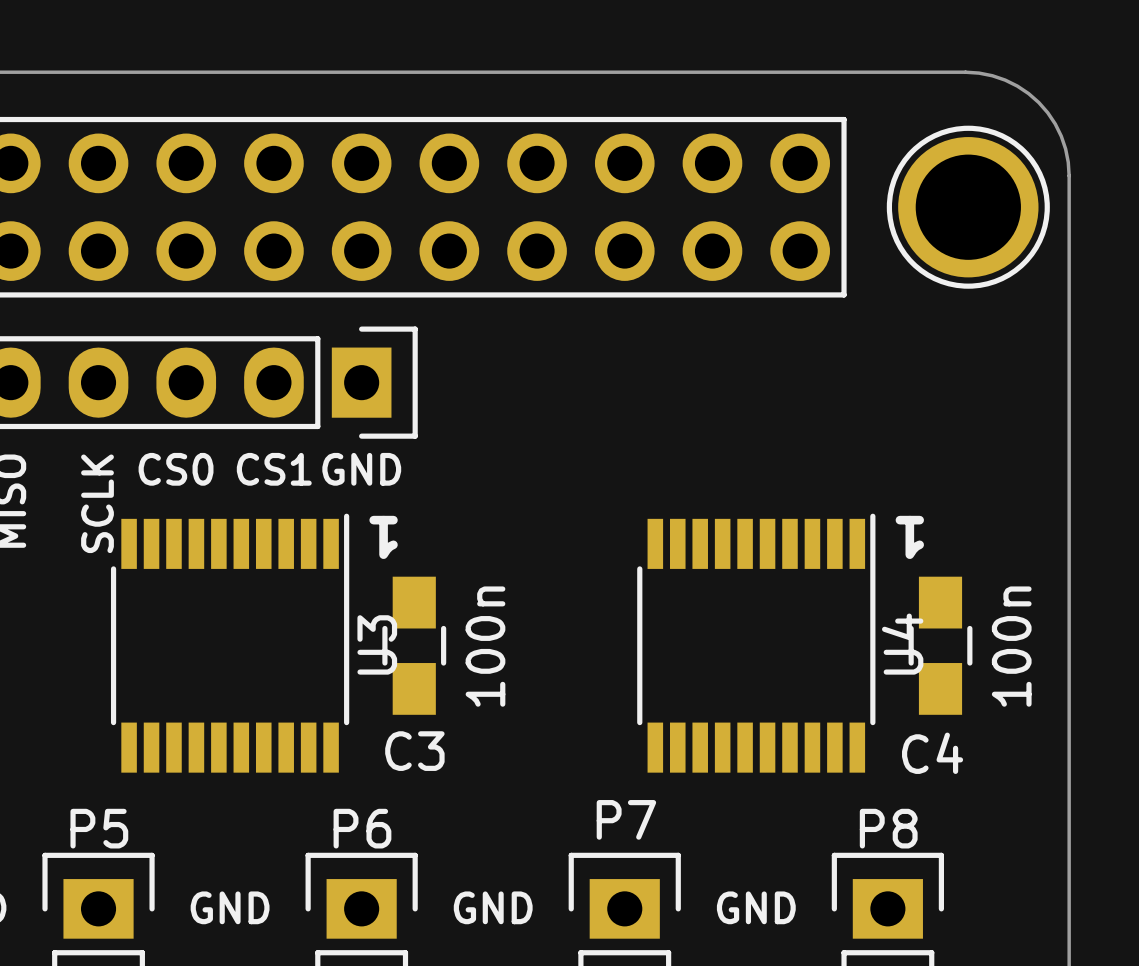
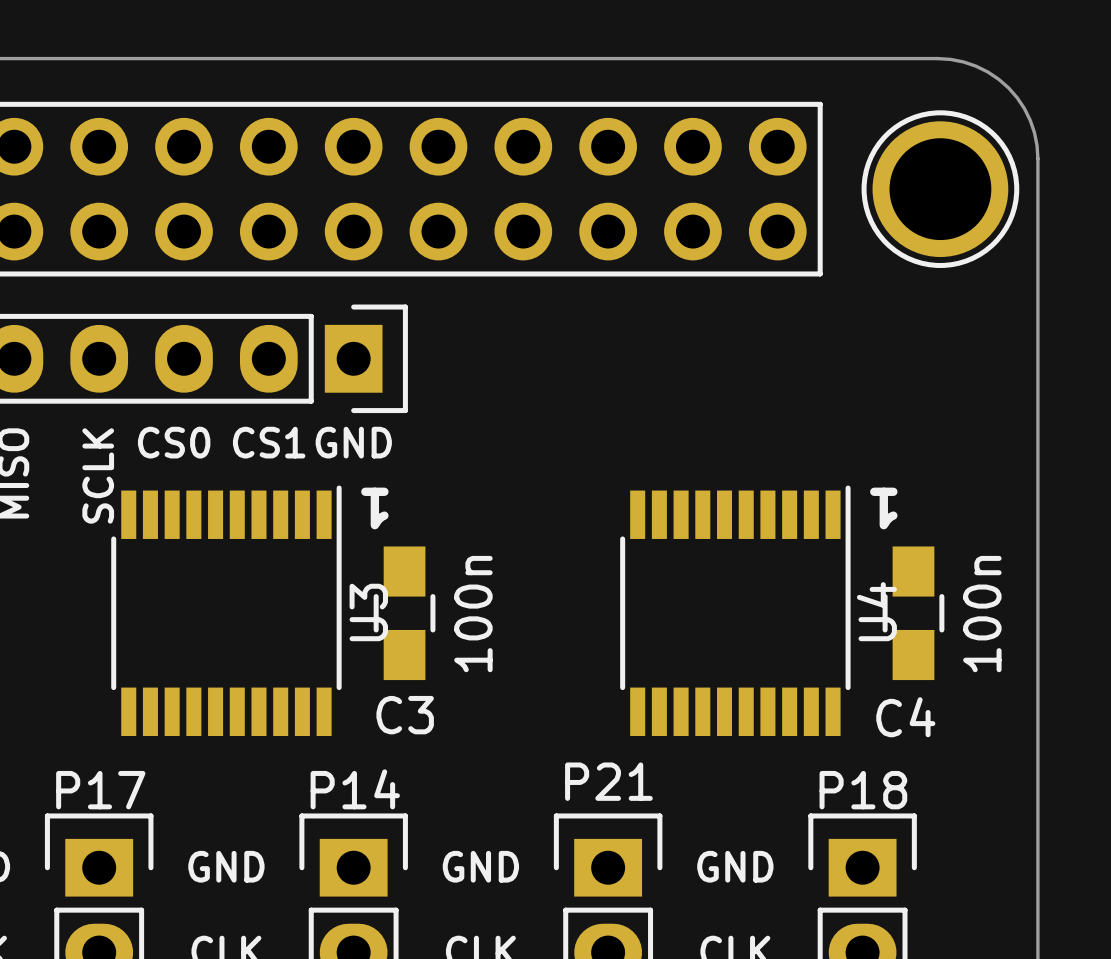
P7 name: P7 (626, 819) -> P21 (608, 781)
P5 name: P5 (99, 828) -> P17 (100, 790)
P6 name: P6 (362, 828) -> P14 (355, 789)
P8 name: P8 (888, 828) -> P18 (863, 790)

